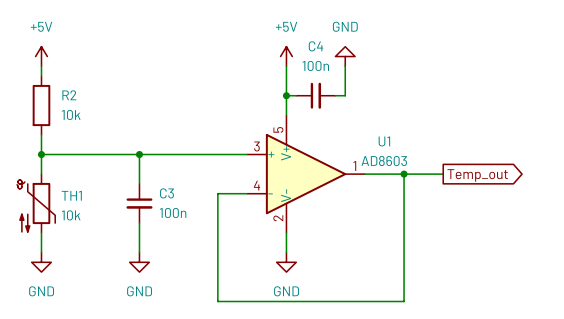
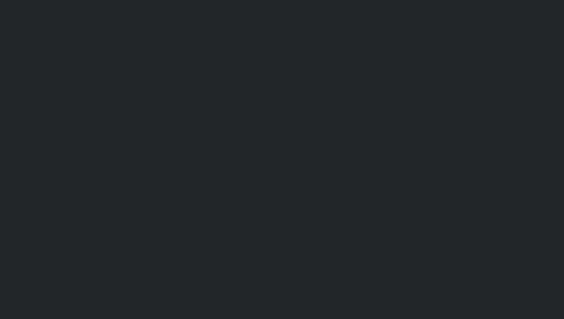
power symbol: +5V (41, 56) -> none
power symbol: +5V (286, 56) -> none
power symbol: GND (345, 56) -> none
wire: (41, 66) (41, 76) -> none
wire: (286, 66) (286, 115) -> none
wire: (345, 66) (345, 95) (335, 95) -> none
wire: (286, 95) (296, 95) -> none
junction: (286, 95) -> none
C4: 100n (315, 95) -> none
R2: 10k (41, 105) -> none
wire: (41, 134) (41, 174) -> none
wire: (41, 154) (247, 154) -> none
junction: (41, 154) -> none
wire: (139, 154) (139, 183) -> none
junction: (139, 154) -> none
U1: AD8603 (306, 174) -> none
wire: (364, 174) (443, 174) -> none
wire: (404, 174) (404, 301) (217, 301) (217, 193) (247, 193) -> none
junction: (404, 174) -> none
global label: Temp_out (477, 175) -> none
TH1: 10k (36, 203) -> none
C3: 100n (139, 203) -> none
wire: (139, 223) (139, 252) -> none
wire: (41, 232) (41, 252) -> none
wire: (286, 232) (286, 252) -> none
power symbol: GND (41, 262) -> none
power symbol: GND (139, 262) -> none
power symbol: GND (286, 262) -> none

